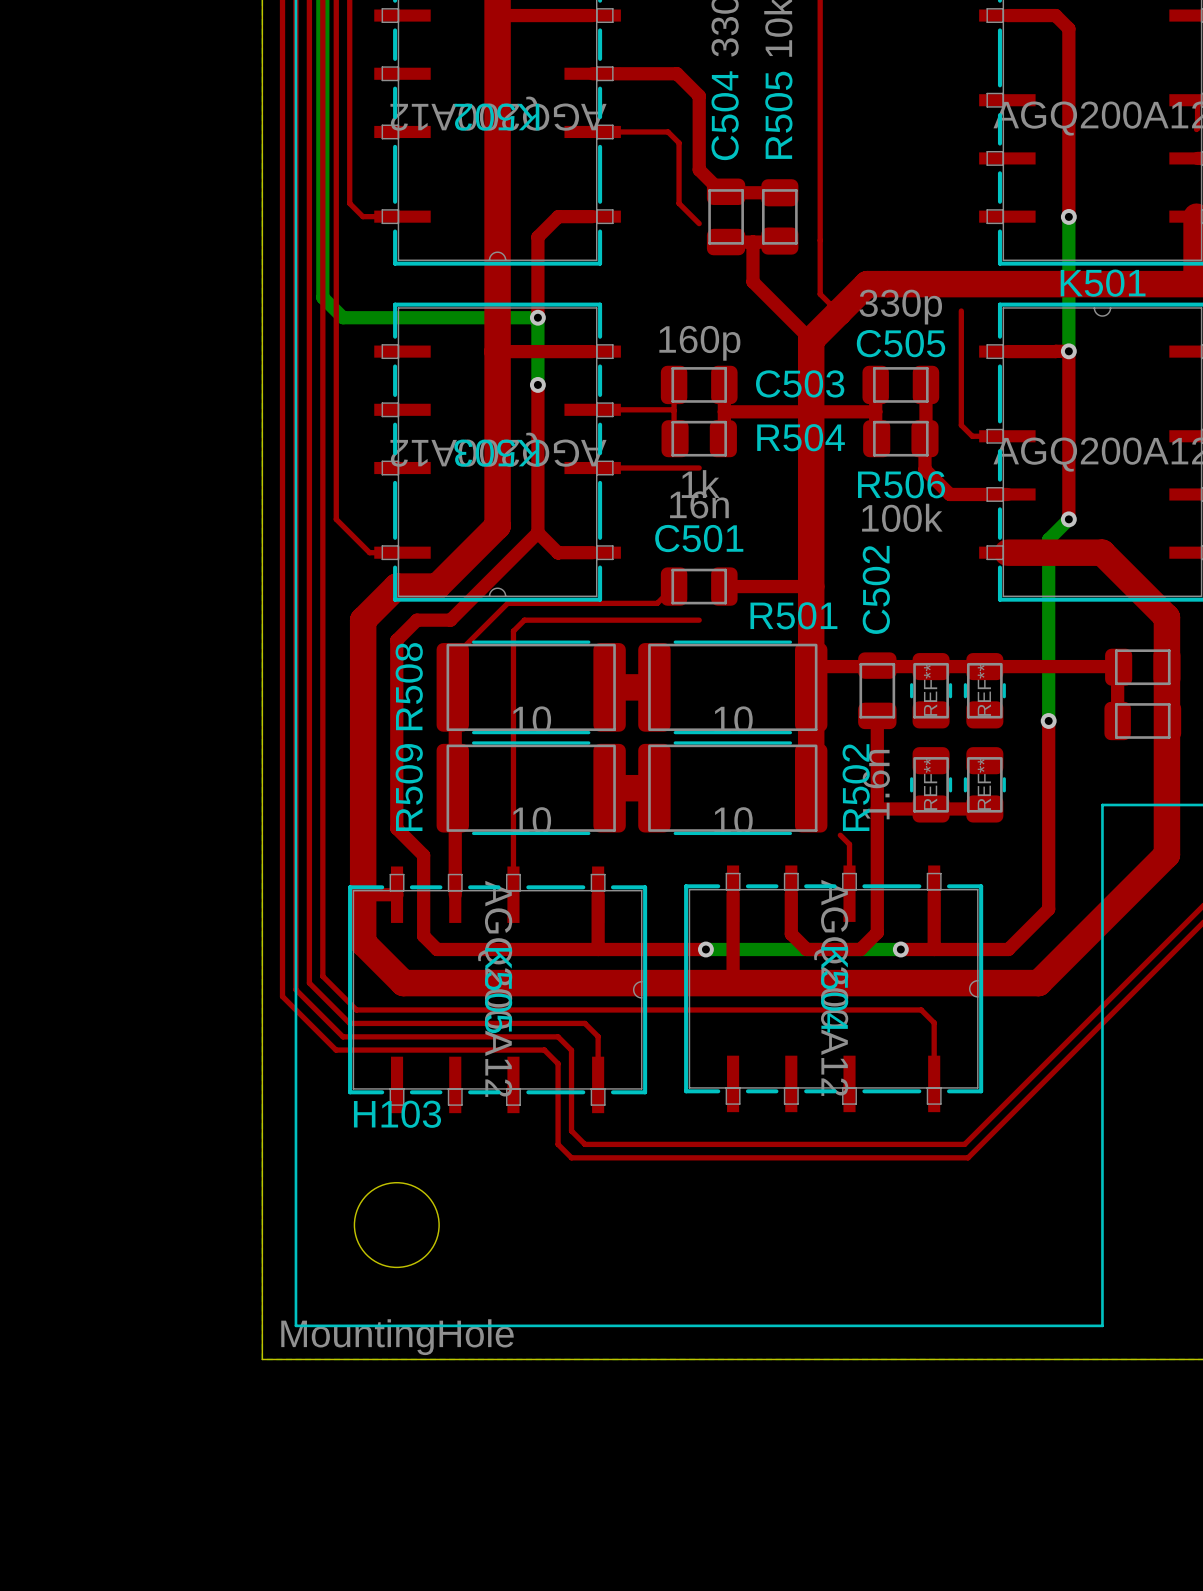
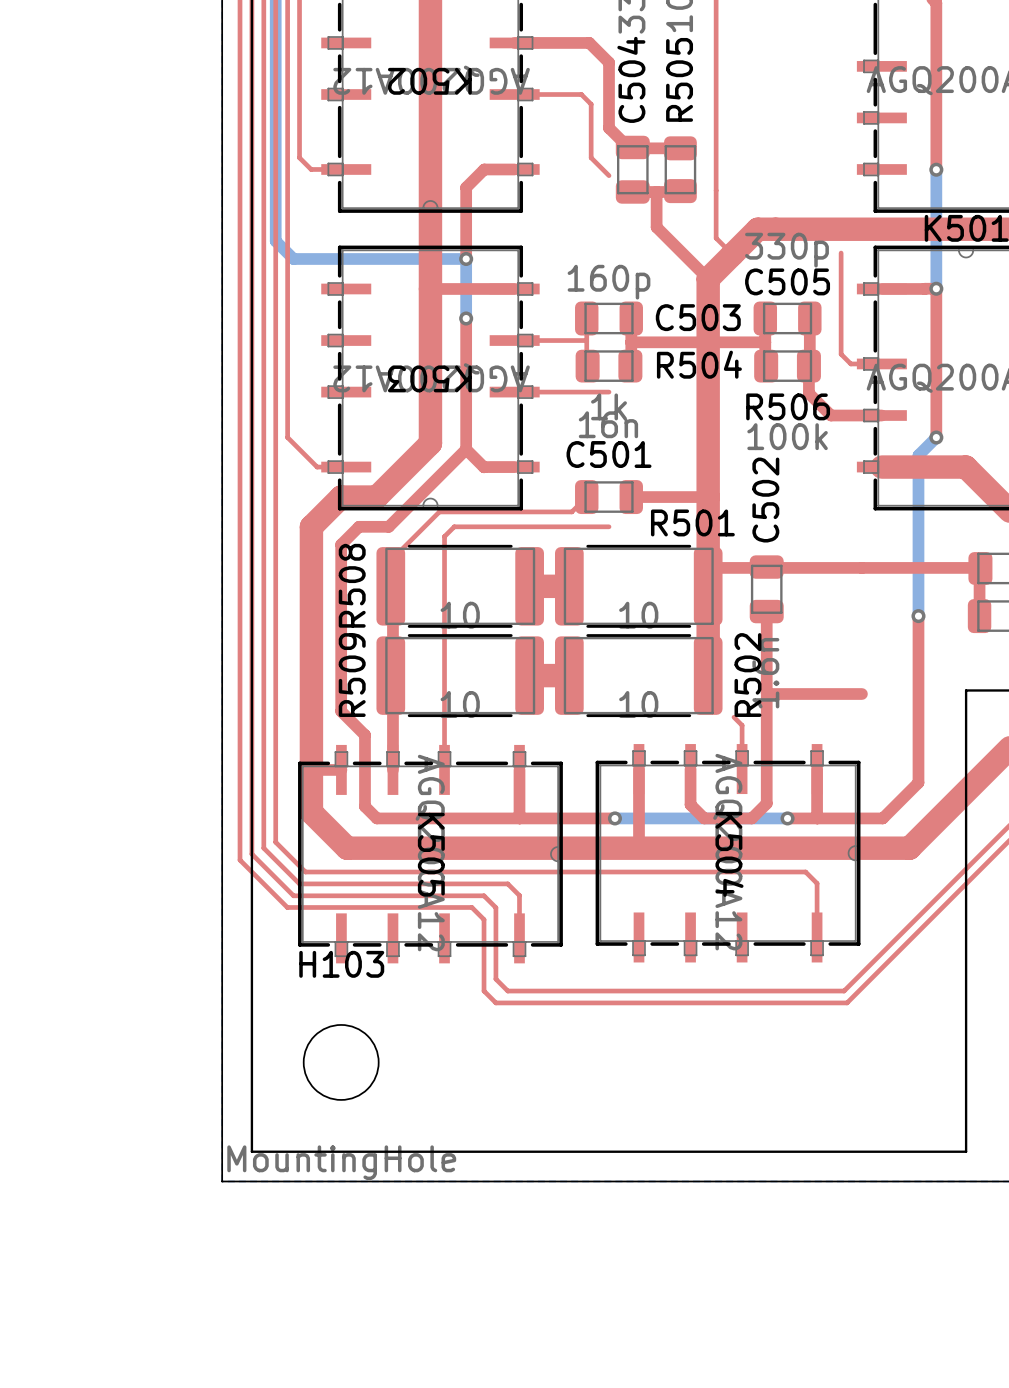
REF**: (931, 690) -> none
REF**: (984, 690) -> none
REF**: (931, 784) -> none
REF**: (984, 784) -> none

